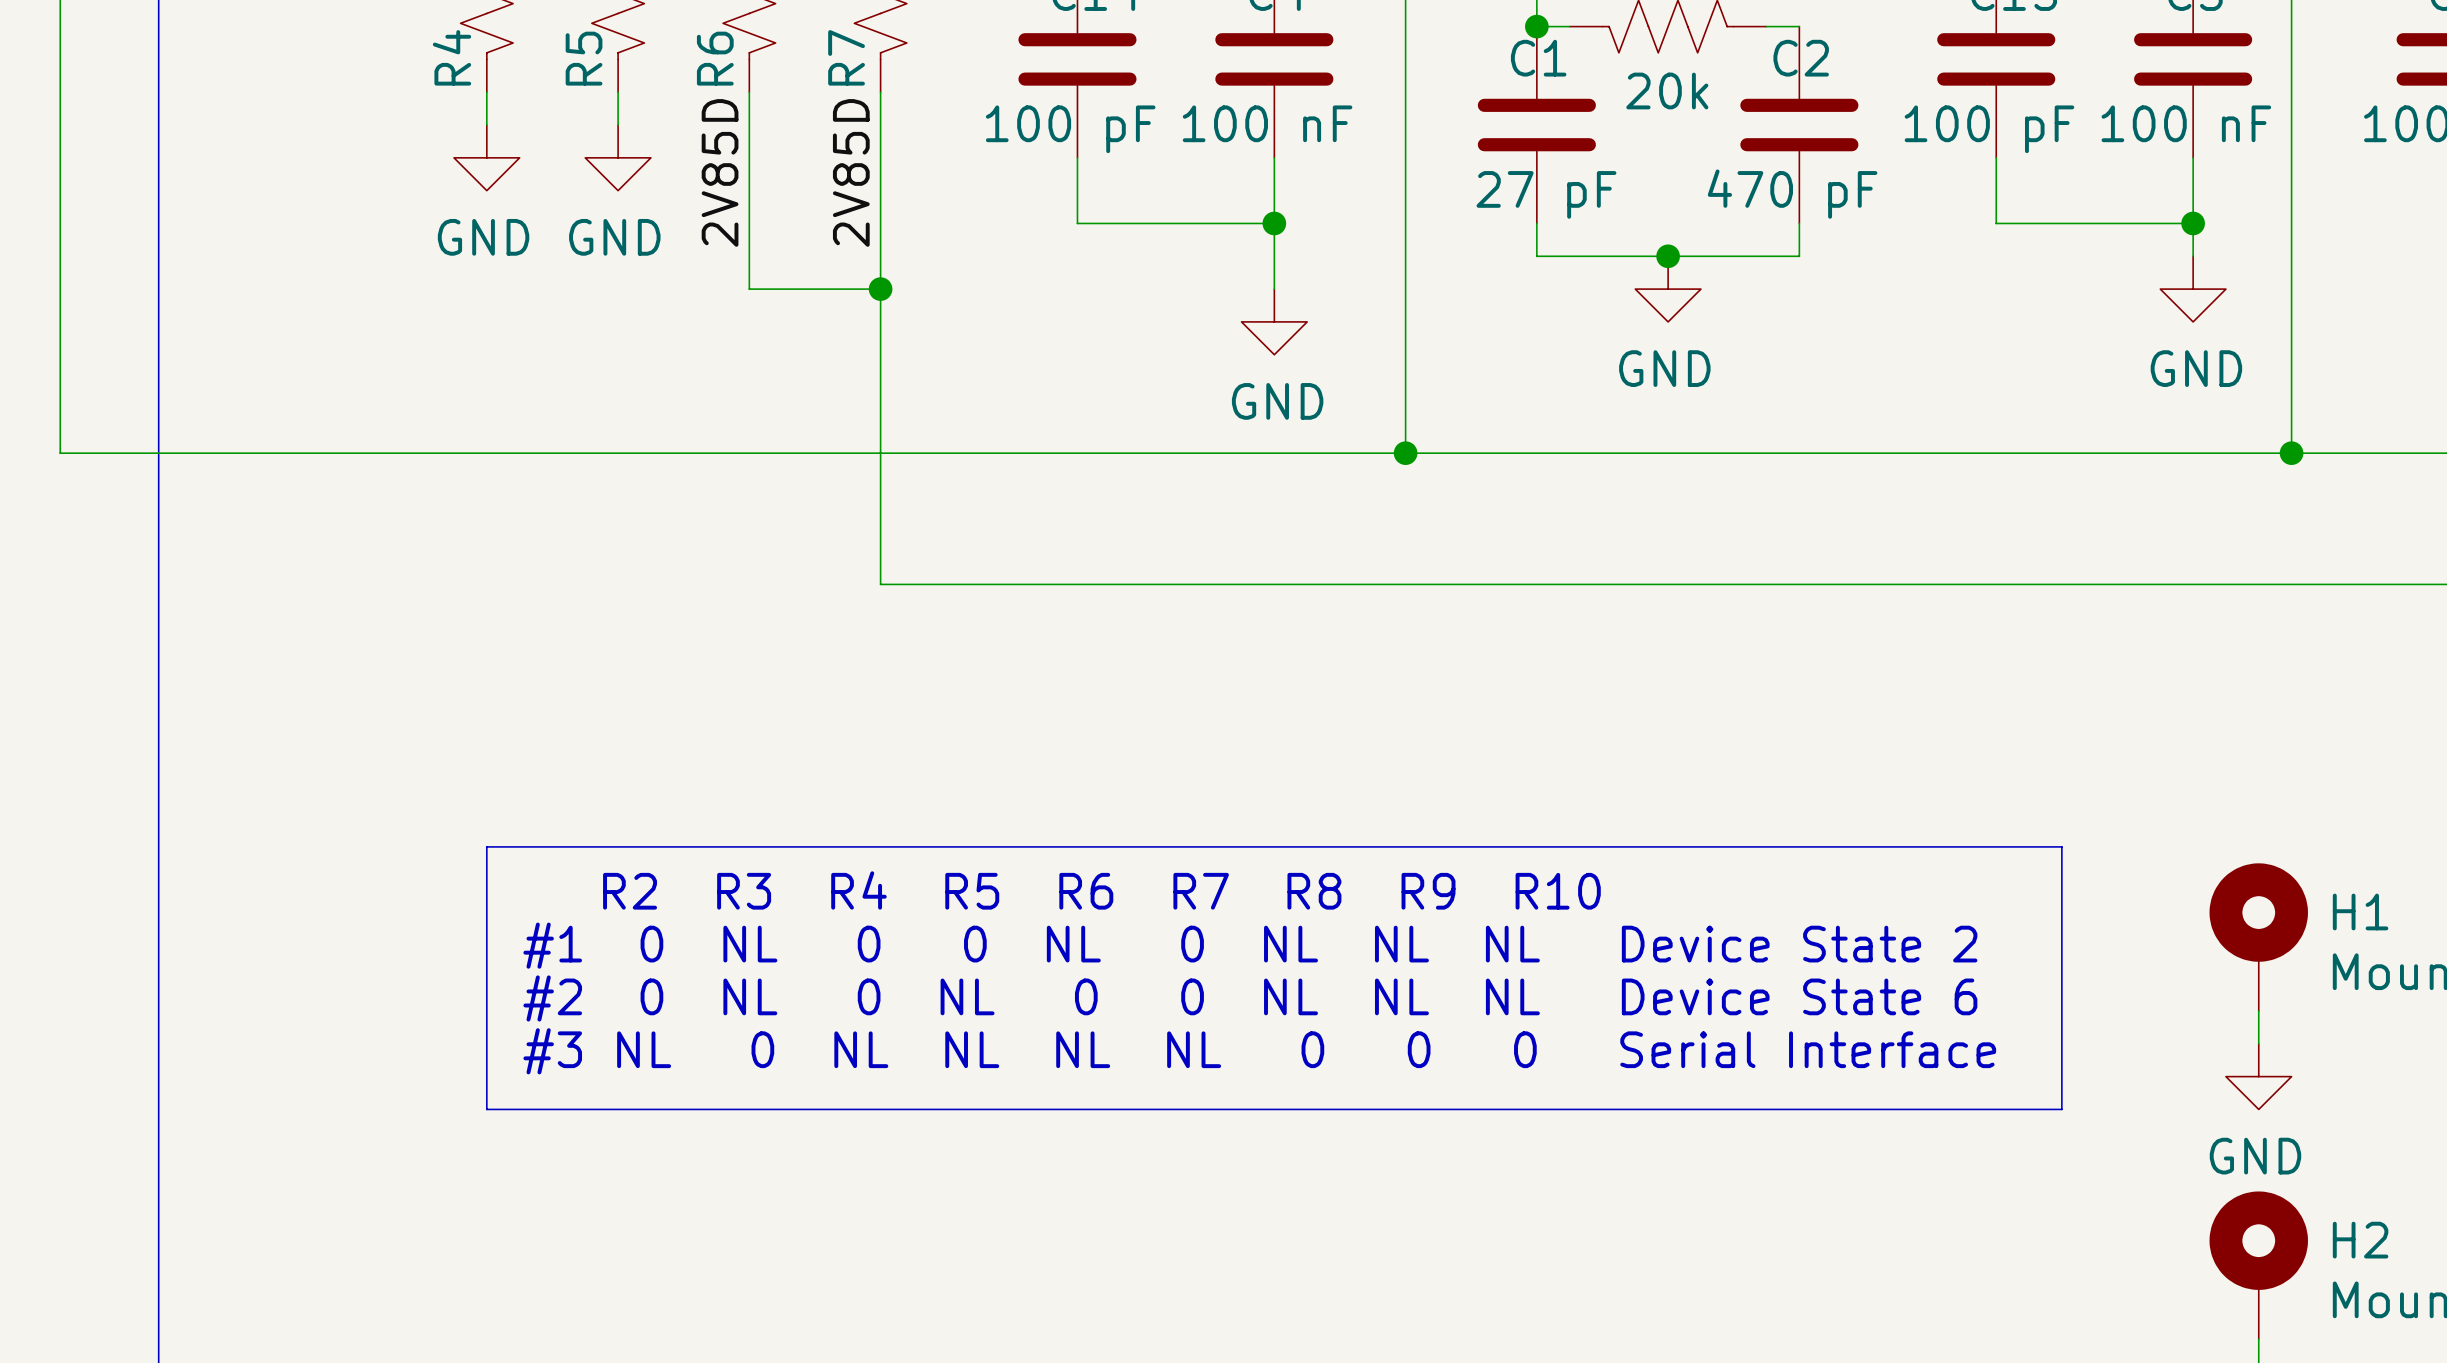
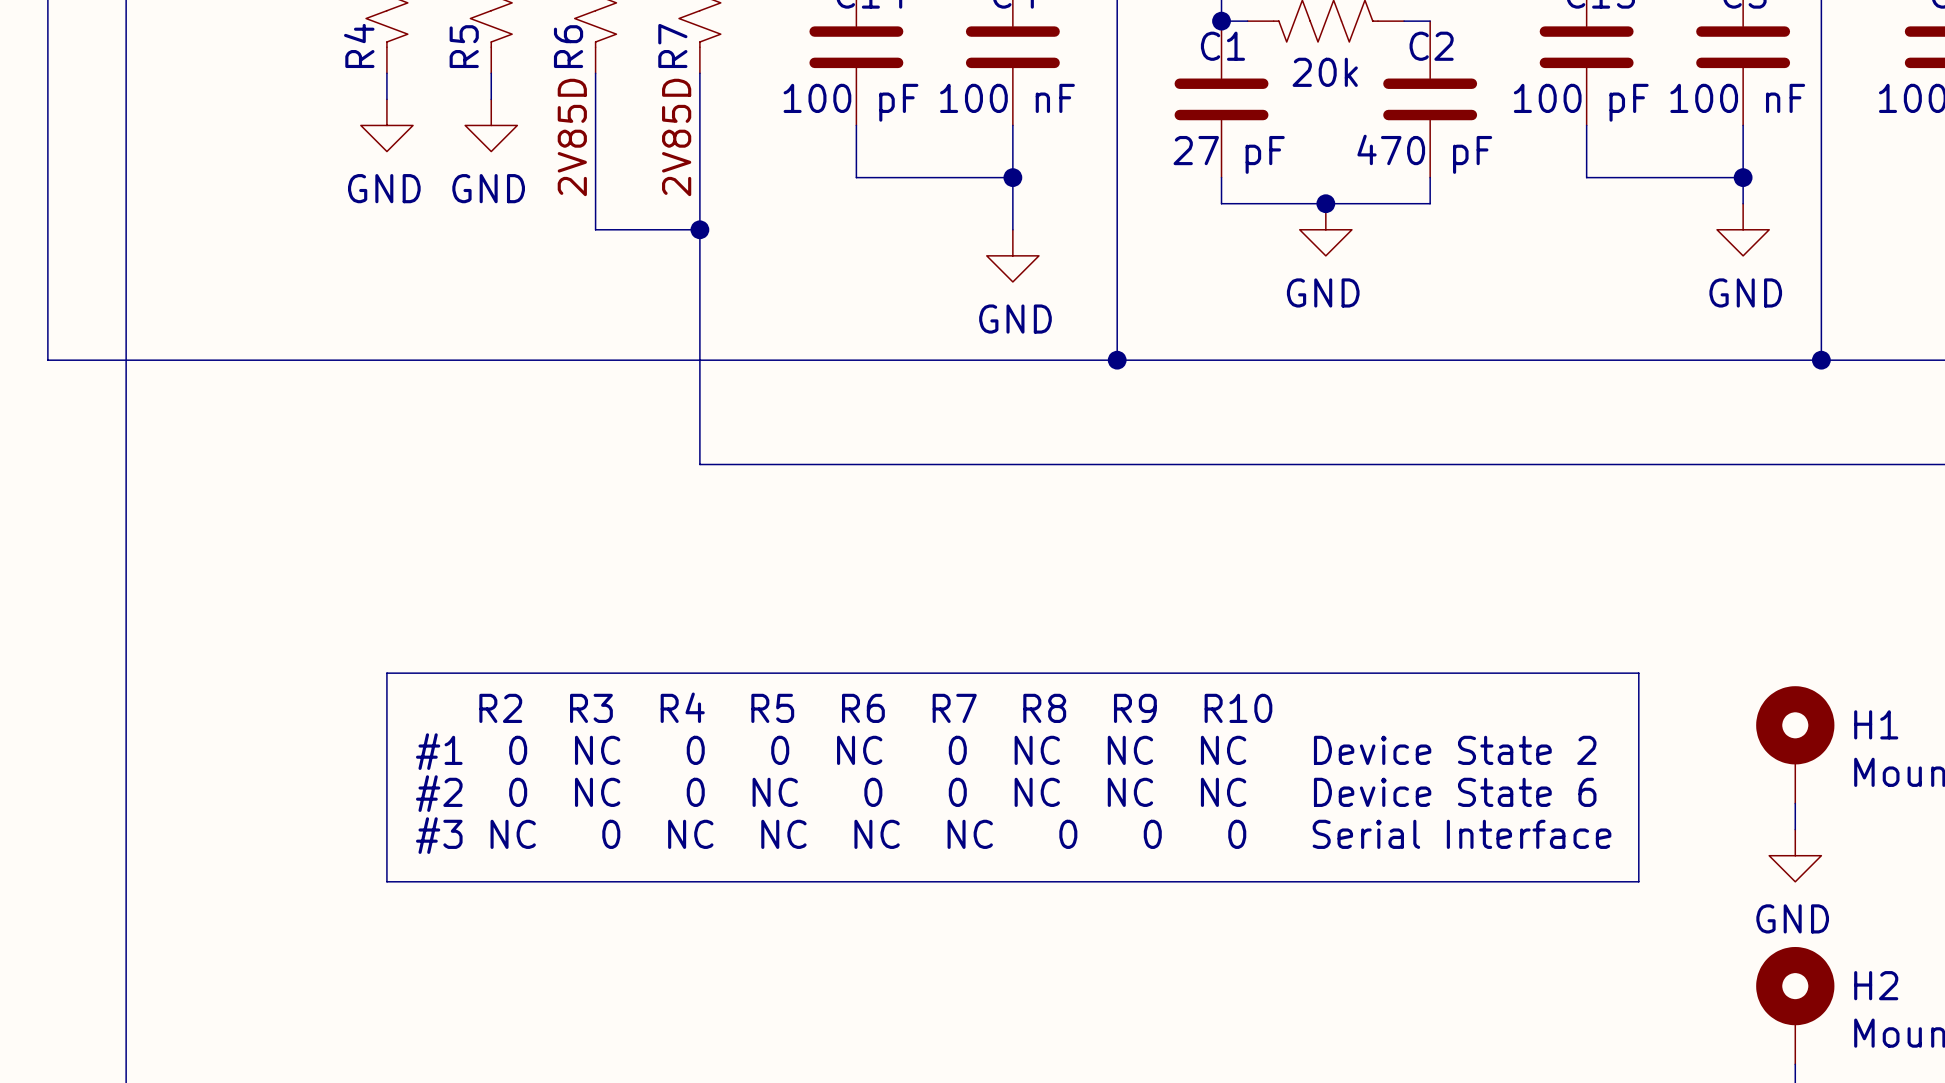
text: #1 0 NL 0 0 NL 0 NL NL NL Device State 2 (1250, 945) -> #1 0 NC 0 0 NC 0 NC NC NC Device State 2 (1006, 751)
text: #2 0 NL 0 NL 0 0 NL NL NL Device State 6 (1250, 998) -> #2 0 NC 0 NC 0 0 NC NC NC Device State 6 (1006, 793)
text: #3 NL 0 NL NL NL NL 0 0 0 Serial Interface (1259, 1051) -> #3 NC 0 NC NC NC NC 0 0 0 Serial Interface (1013, 835)

